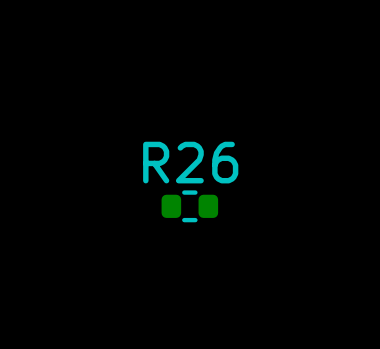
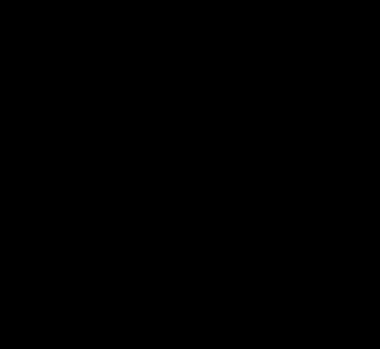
R26: (189, 206) -> none

